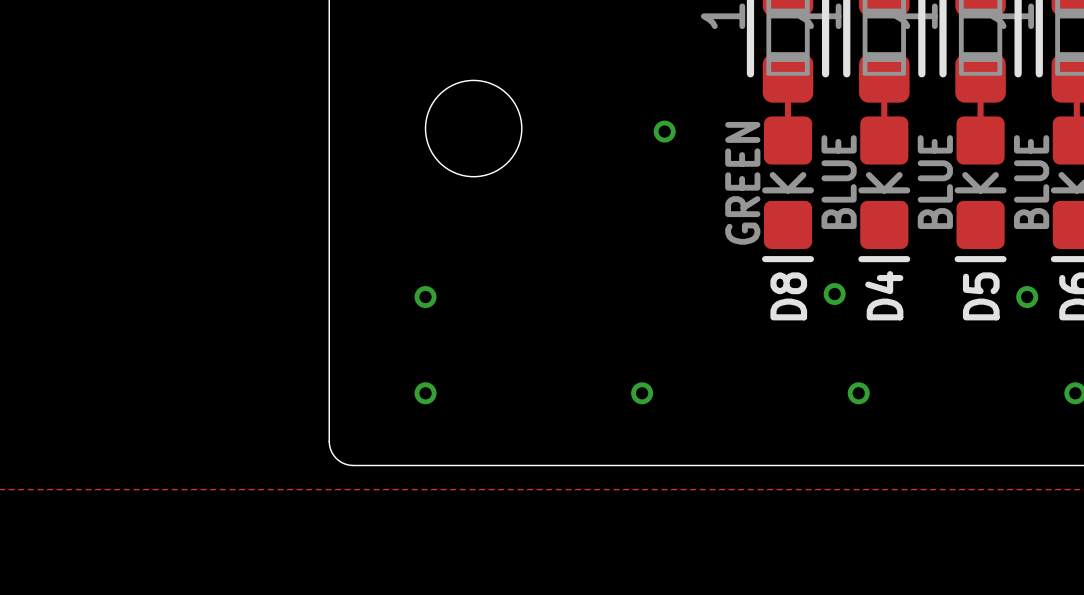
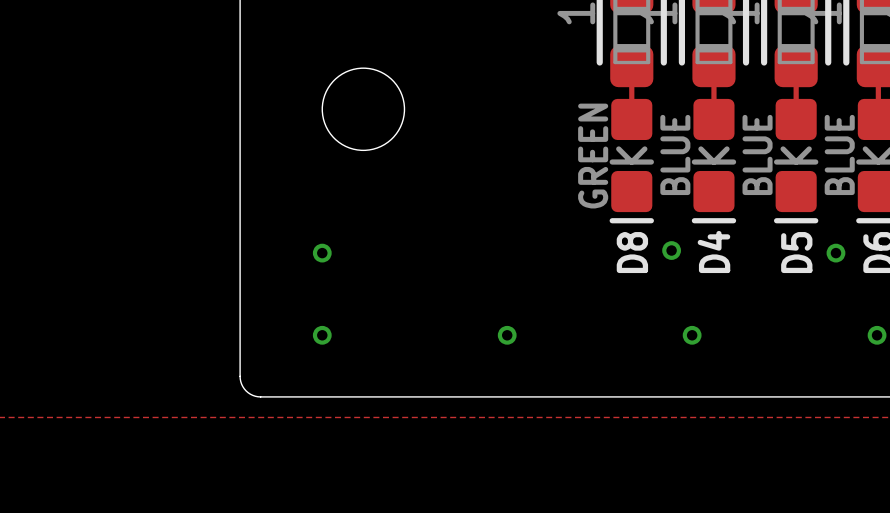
via: (664, 131) -> none

